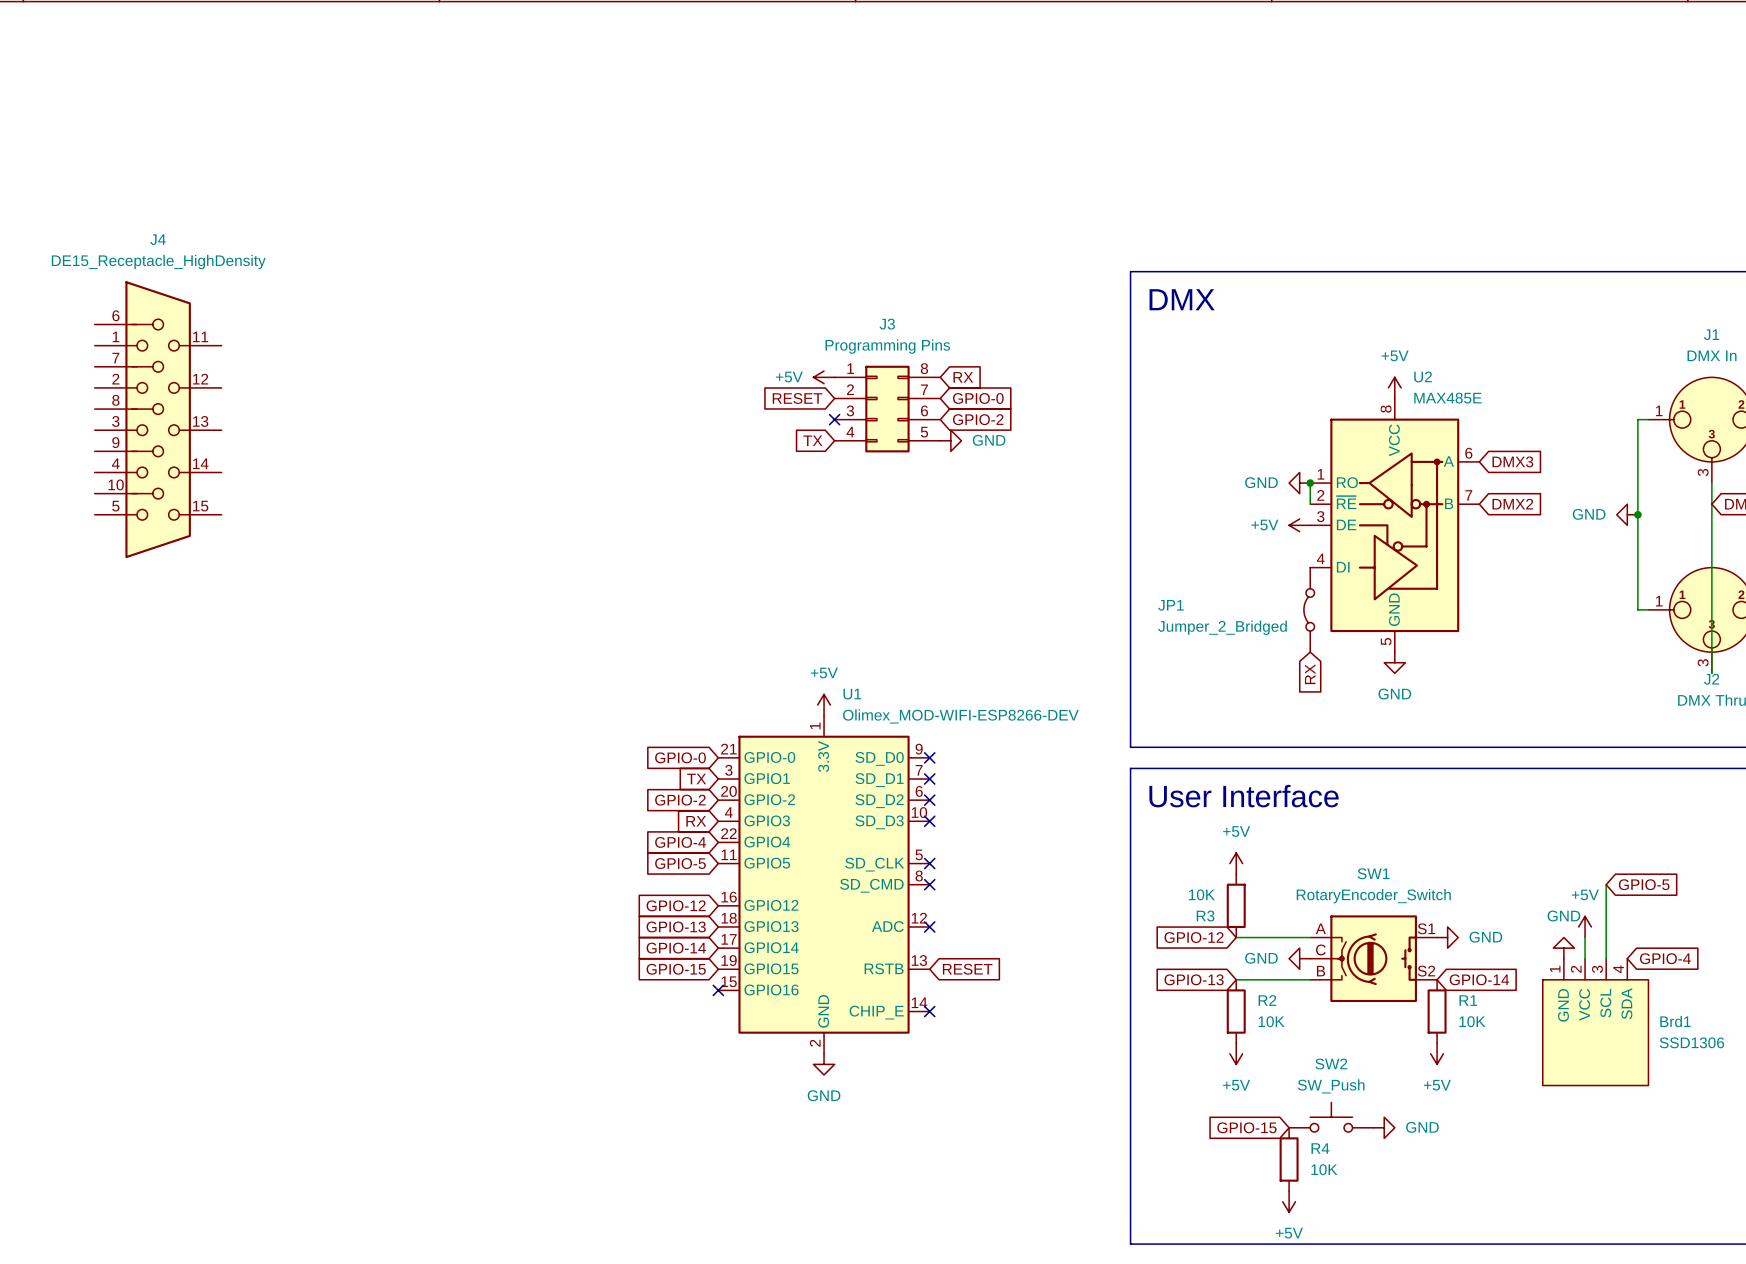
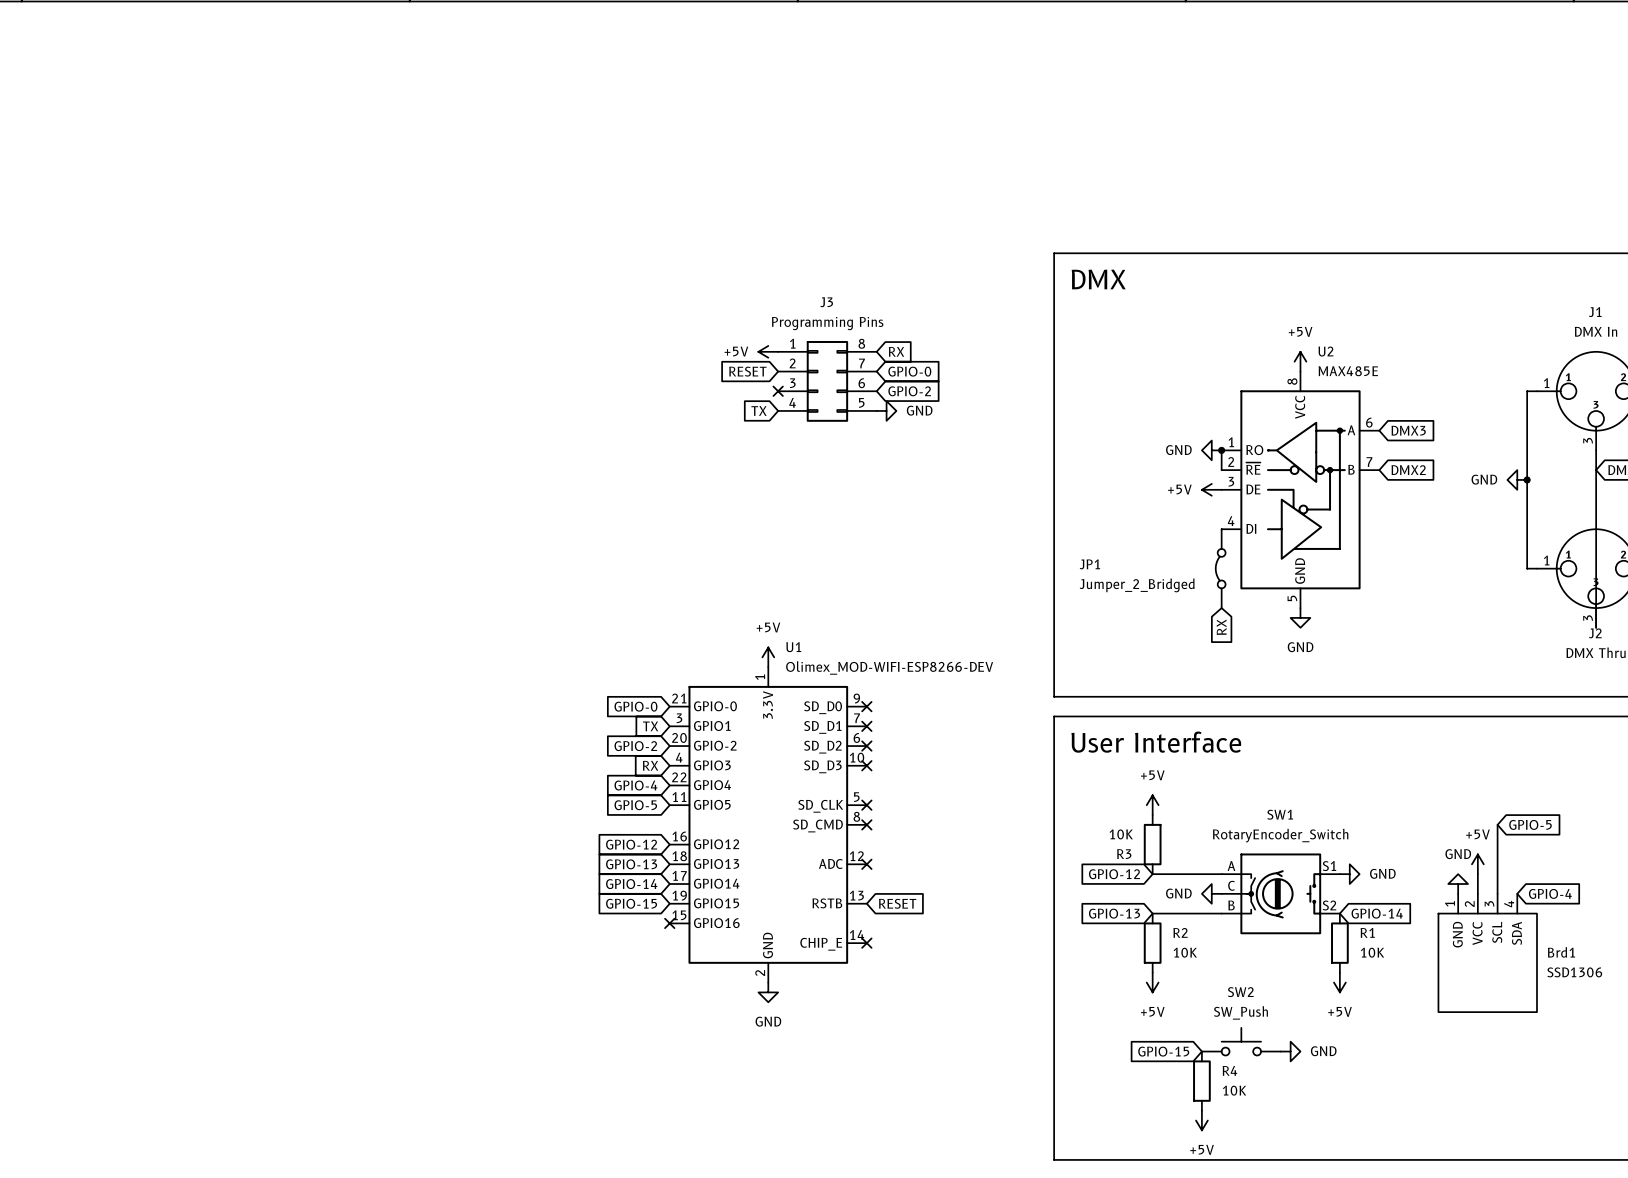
J4: DE15_Receptacle_HighDensity (158, 419) -> none

